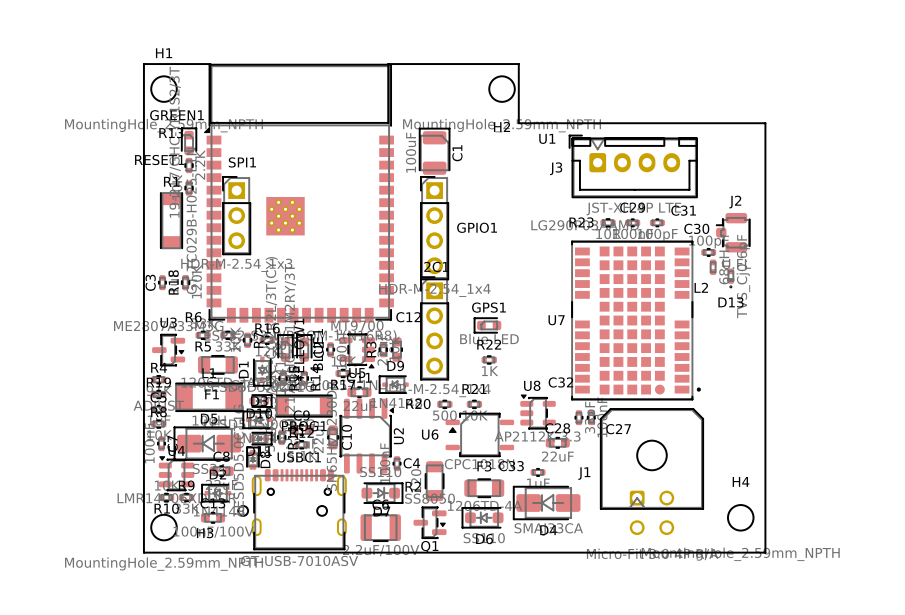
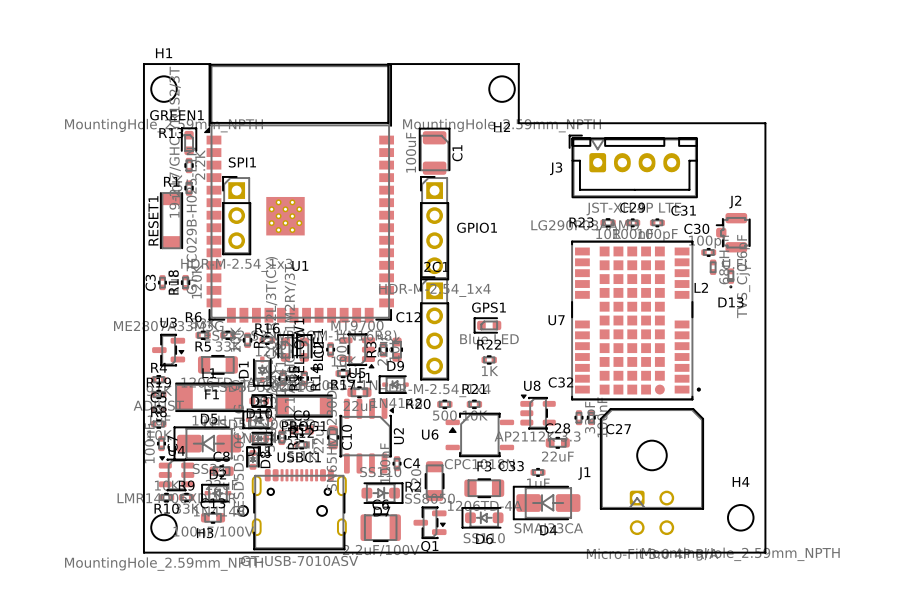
U1 name position: U1 (547, 138) -> U1 (300, 265)
RESET1 name rotation: 0° (159, 160) -> 90° counterclockwise (153, 220)

